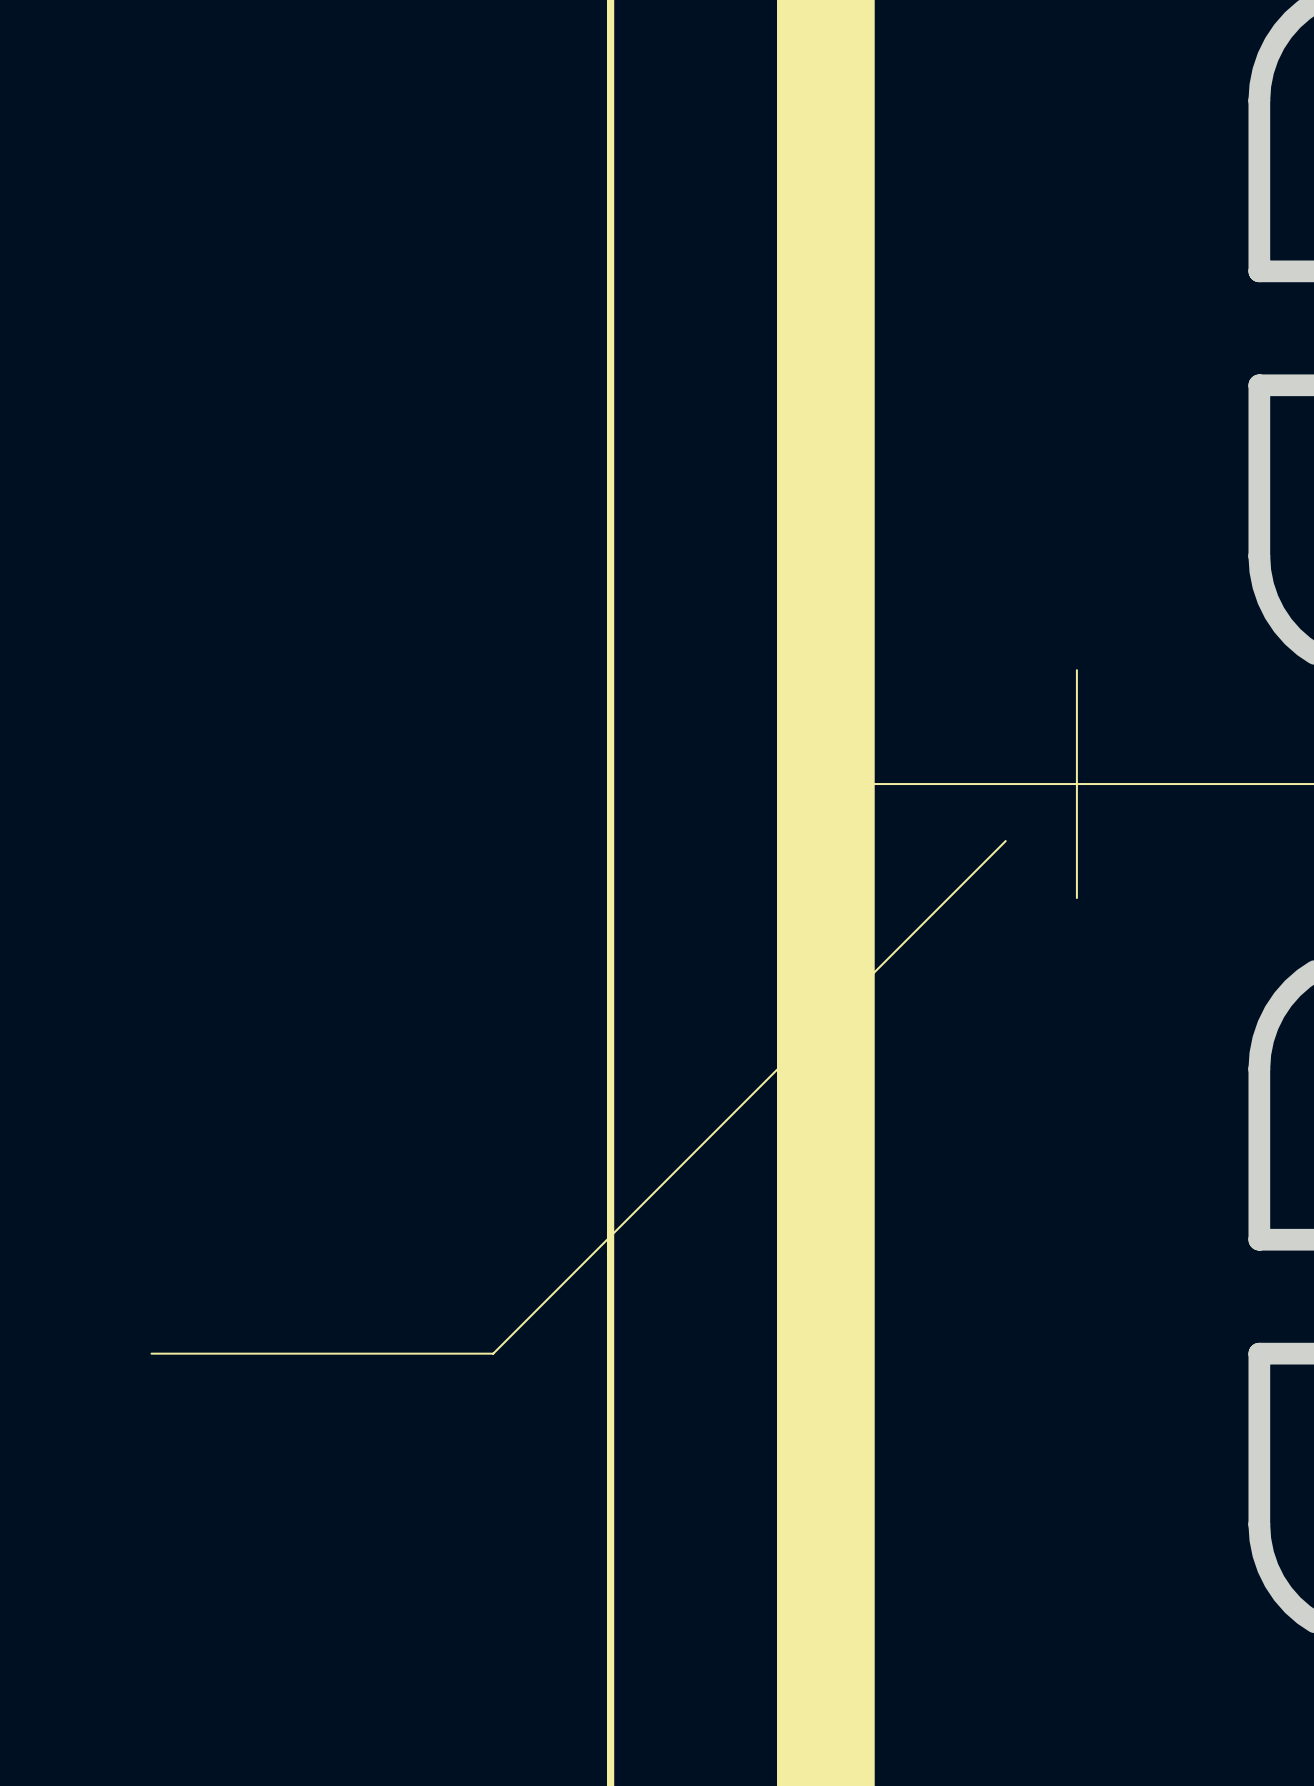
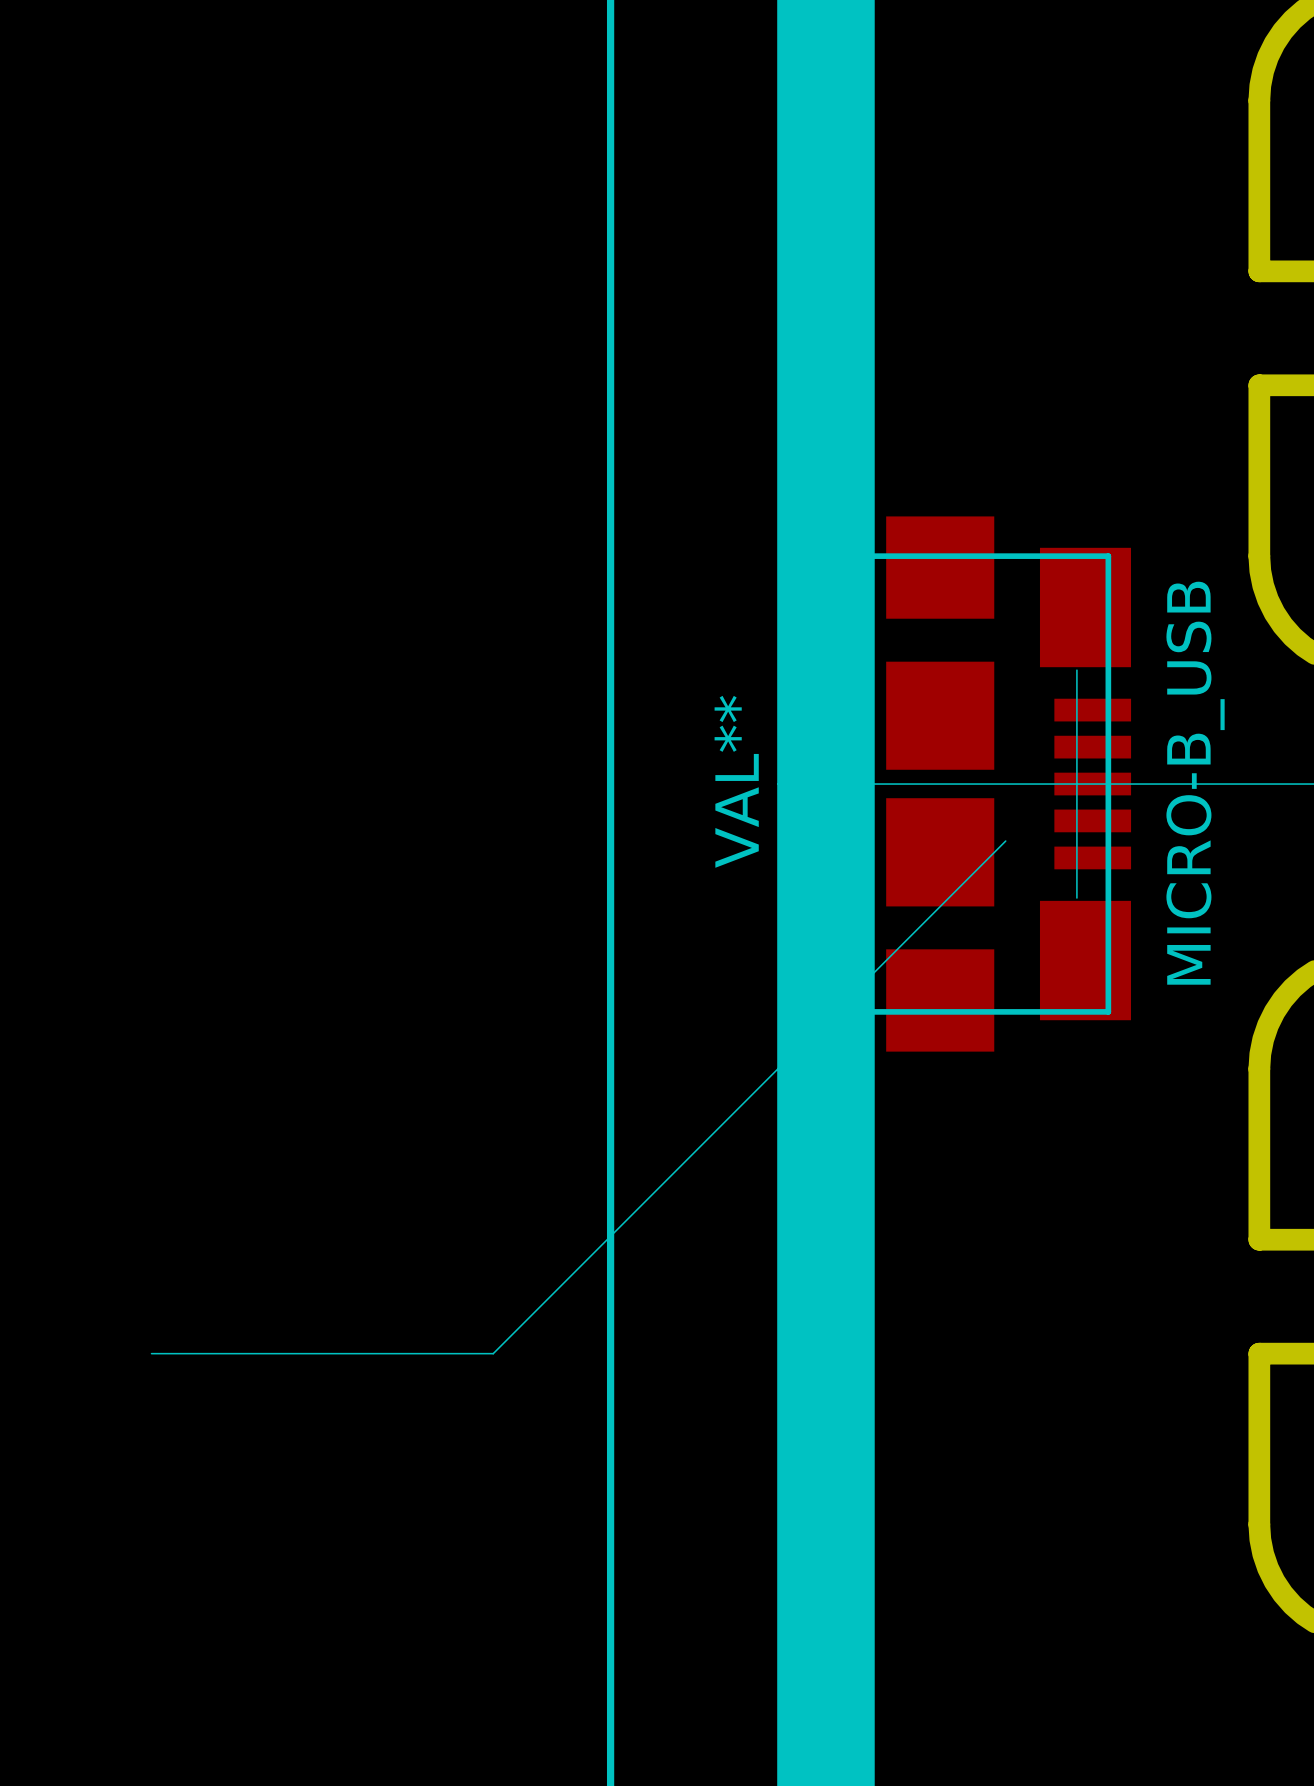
MICRO-B_USB: none -> VAL** (958, 784)

